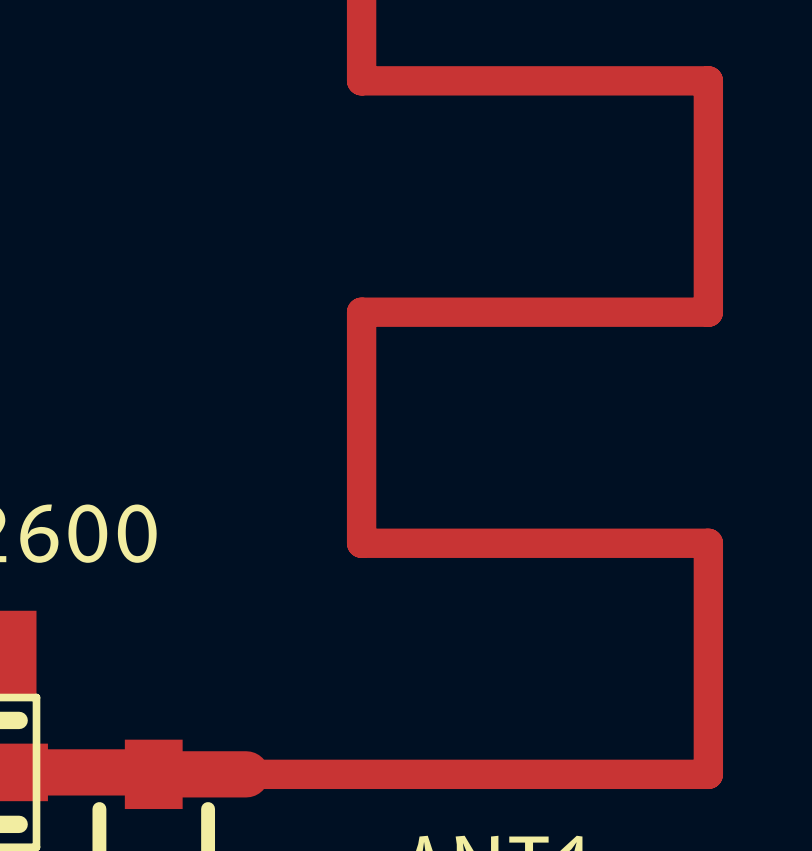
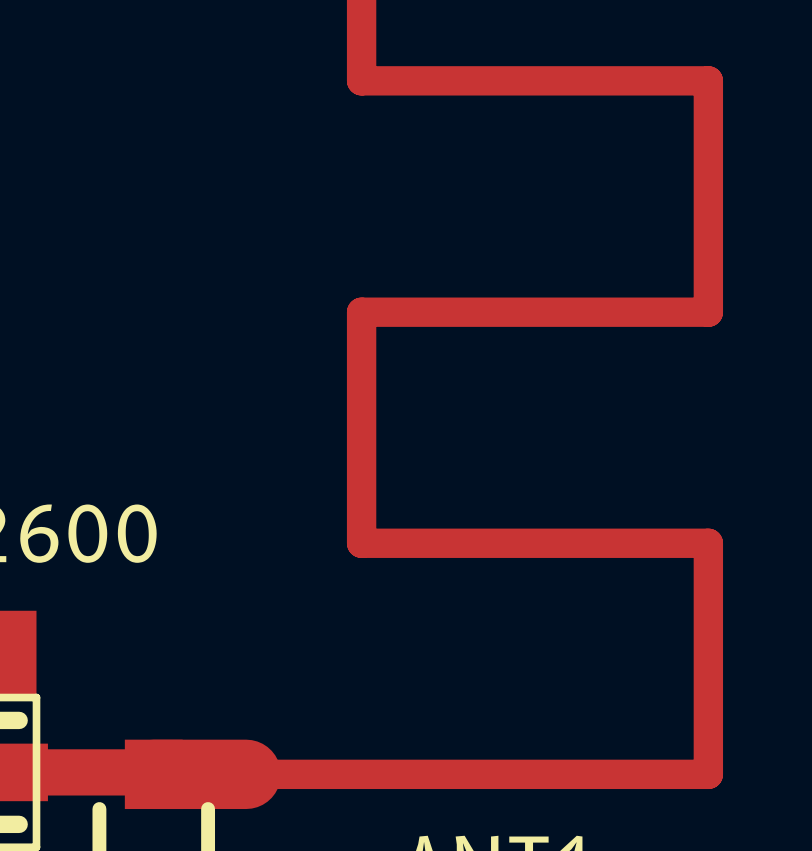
top track width: thin (153, 774) (246, 774) -> thick (153, 774) (246, 774)

